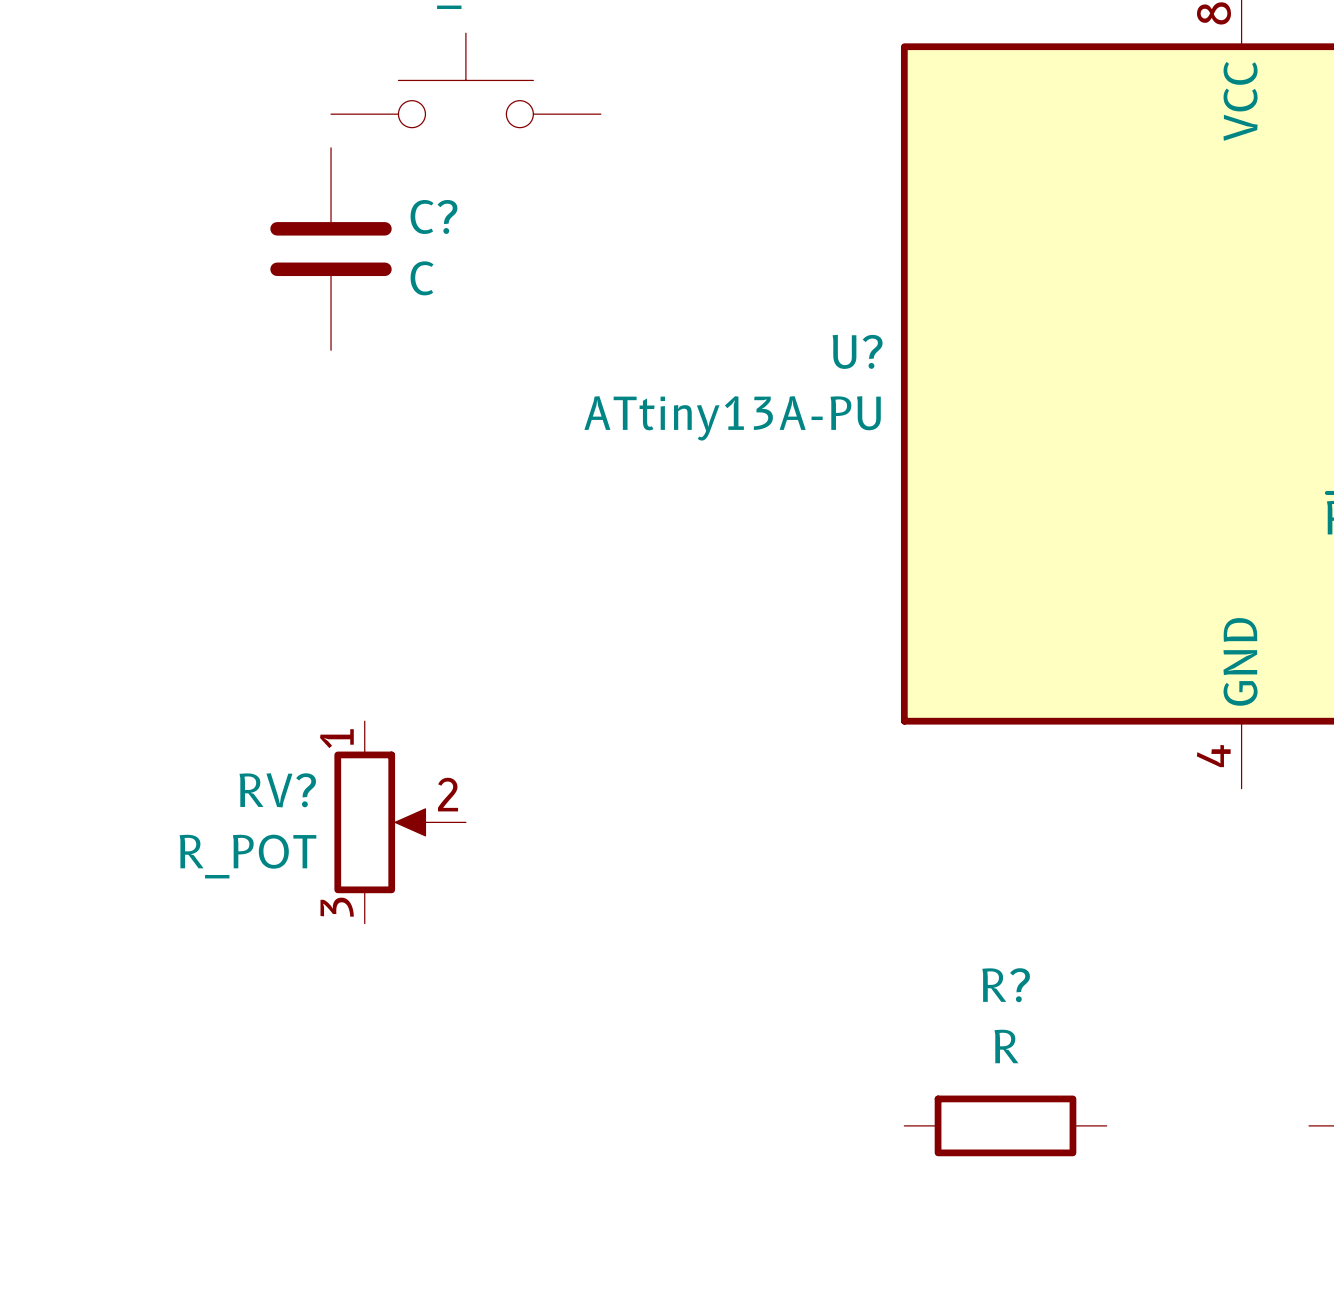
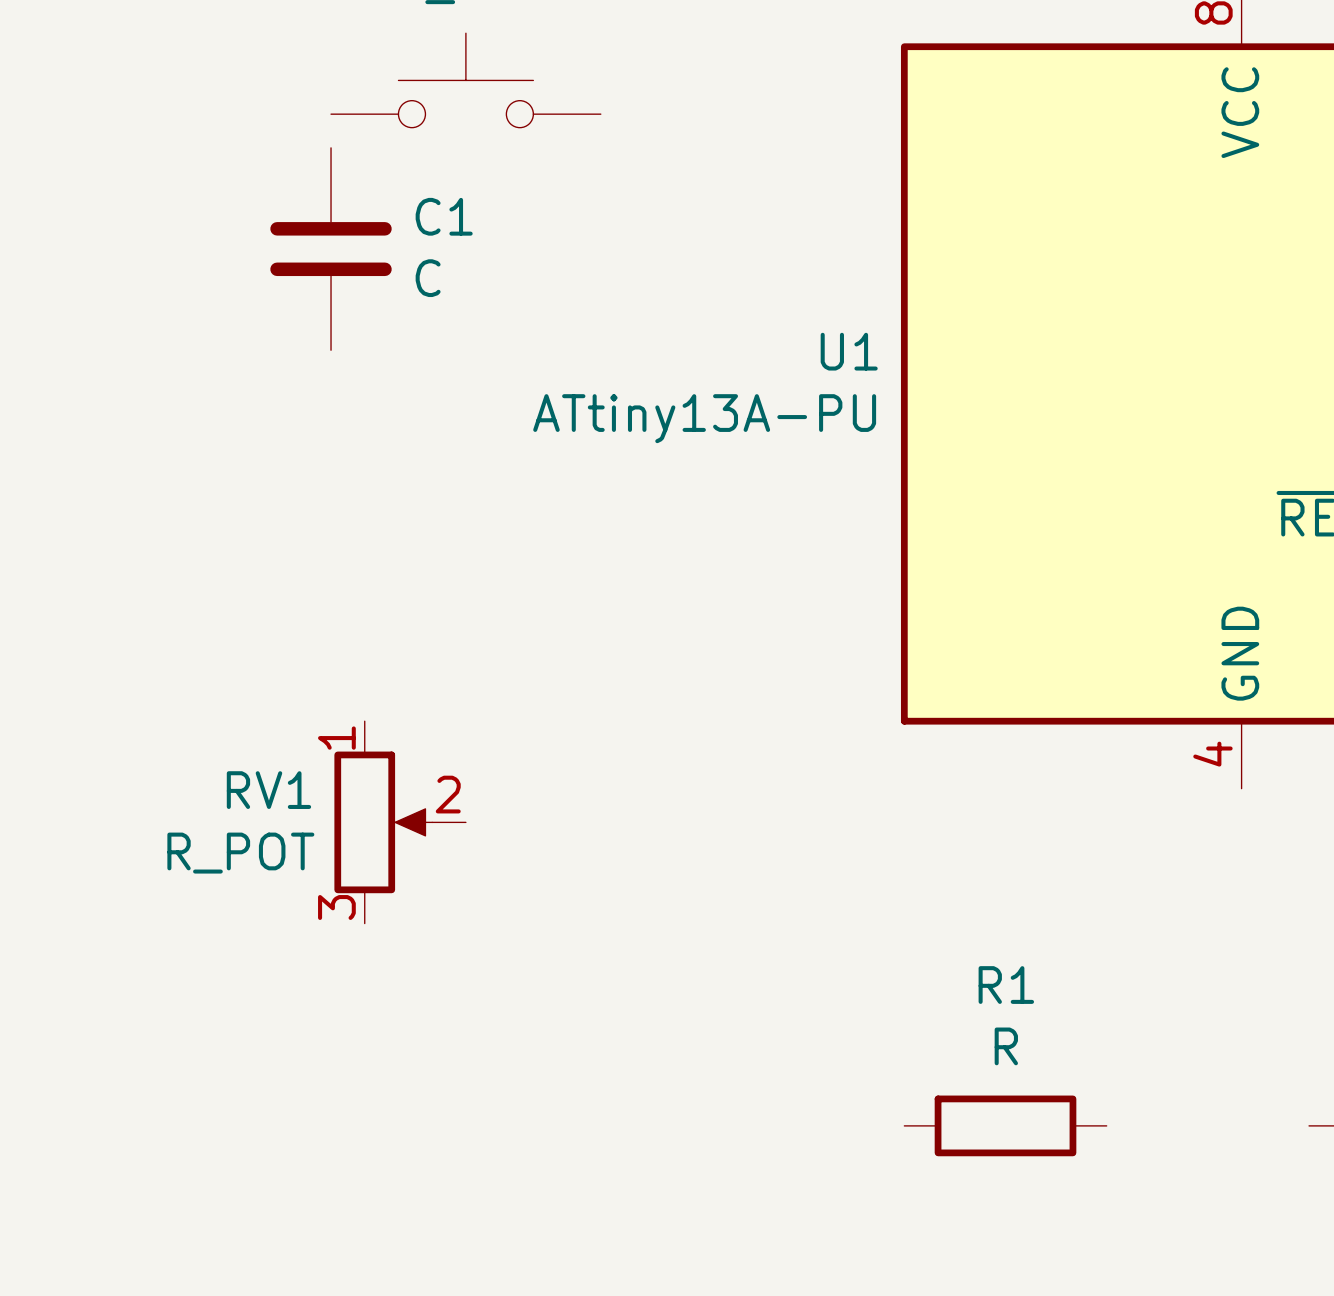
C? name: C? (433, 216) -> C1 (444, 216)
U? name: U? (857, 351) -> U1 (849, 351)
RV? name: RV? (277, 790) -> RV1 (268, 790)
R? name: R? (1006, 985) -> R1 (1006, 985)

